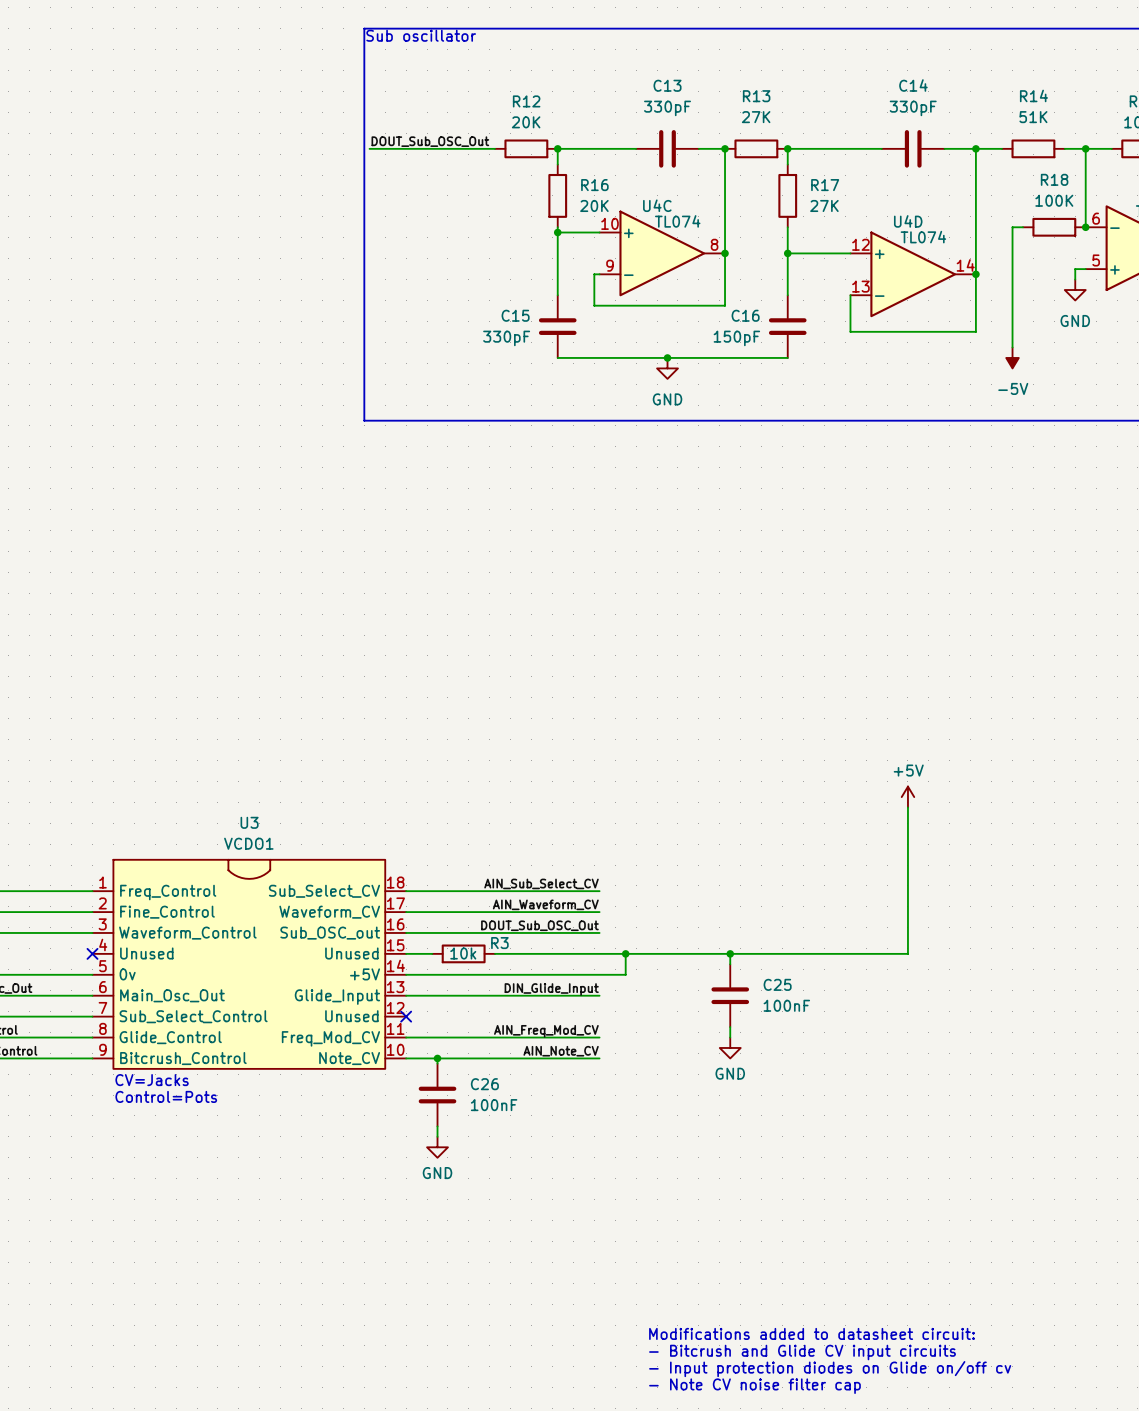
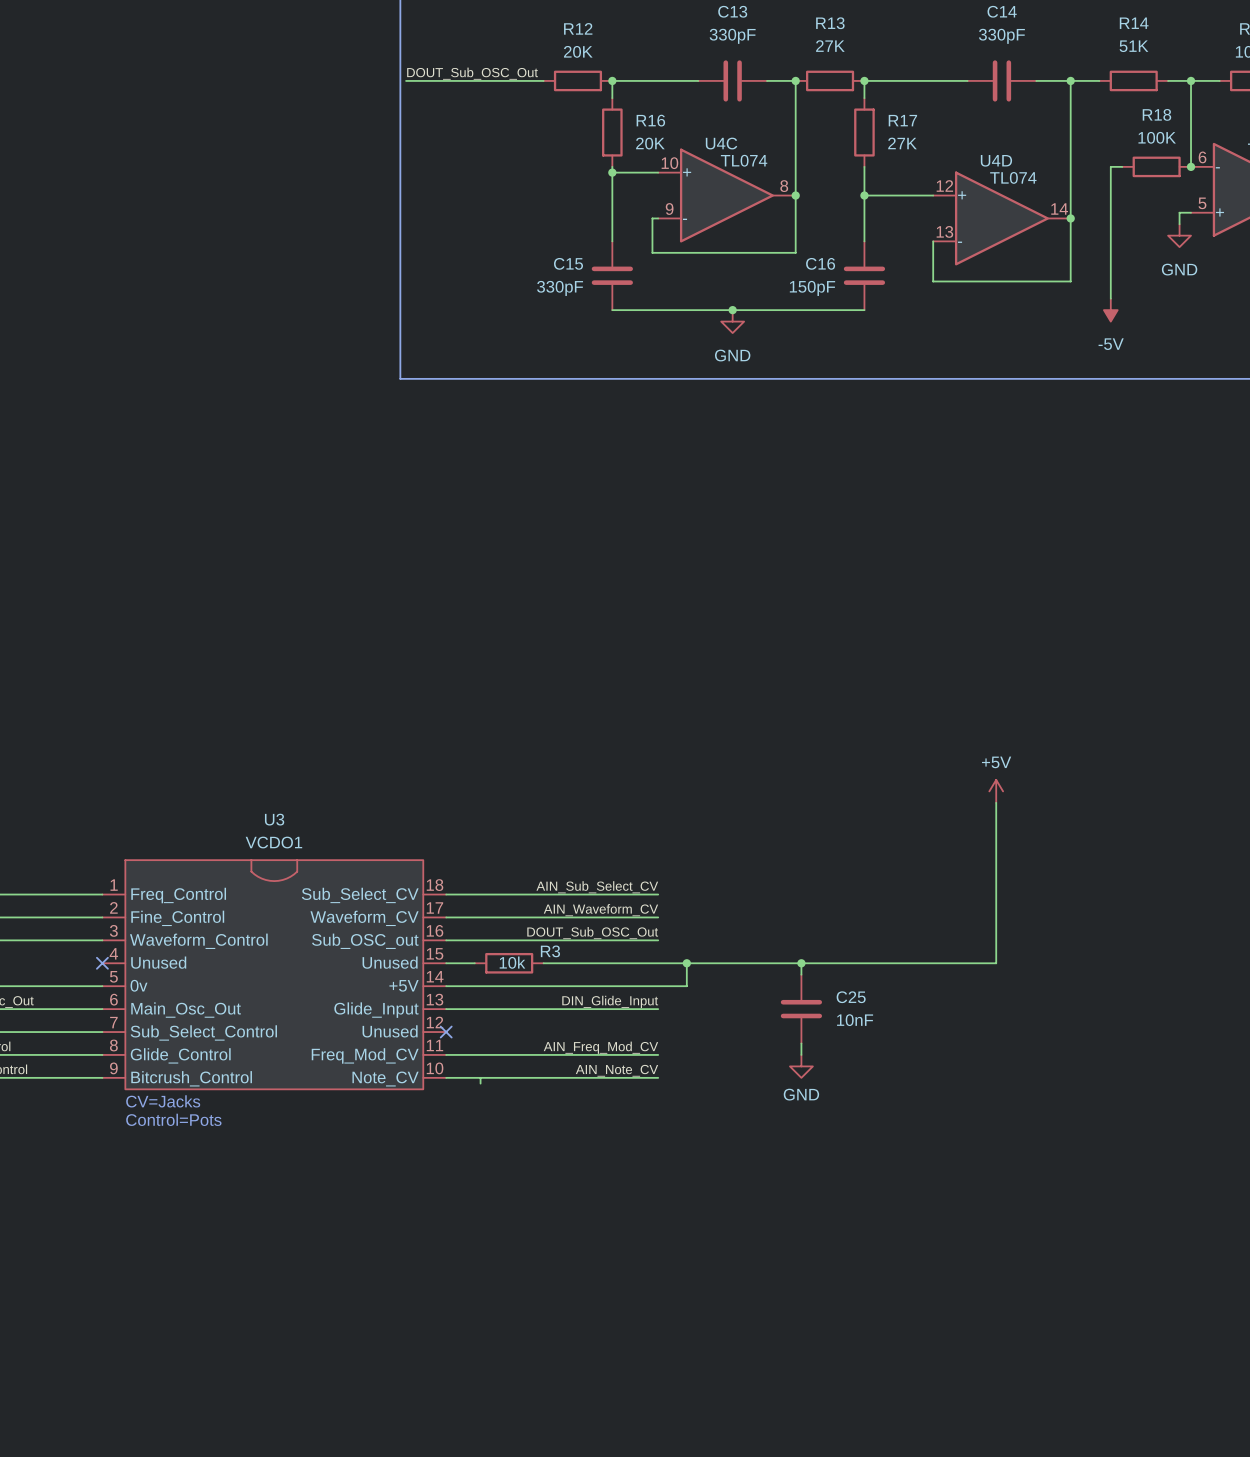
C25 value: 100nF (786, 1005) -> 10nF (855, 1020)
junction: (437, 1058) -> none
C26: 100nF (437, 1095) -> none
wire: (437, 1126) (437, 1136) -> none
power symbol: GND (437, 1147) -> none
text: Modifications added to datasheet circuit: (811, 1333) -> none
text: - Bitcrush and Glide CV input circuits (802, 1352) -> none
text: - Input protection diodes on Glide on/off cv (830, 1369) -> none
text: - Note CV noise filter cap (754, 1386) -> none

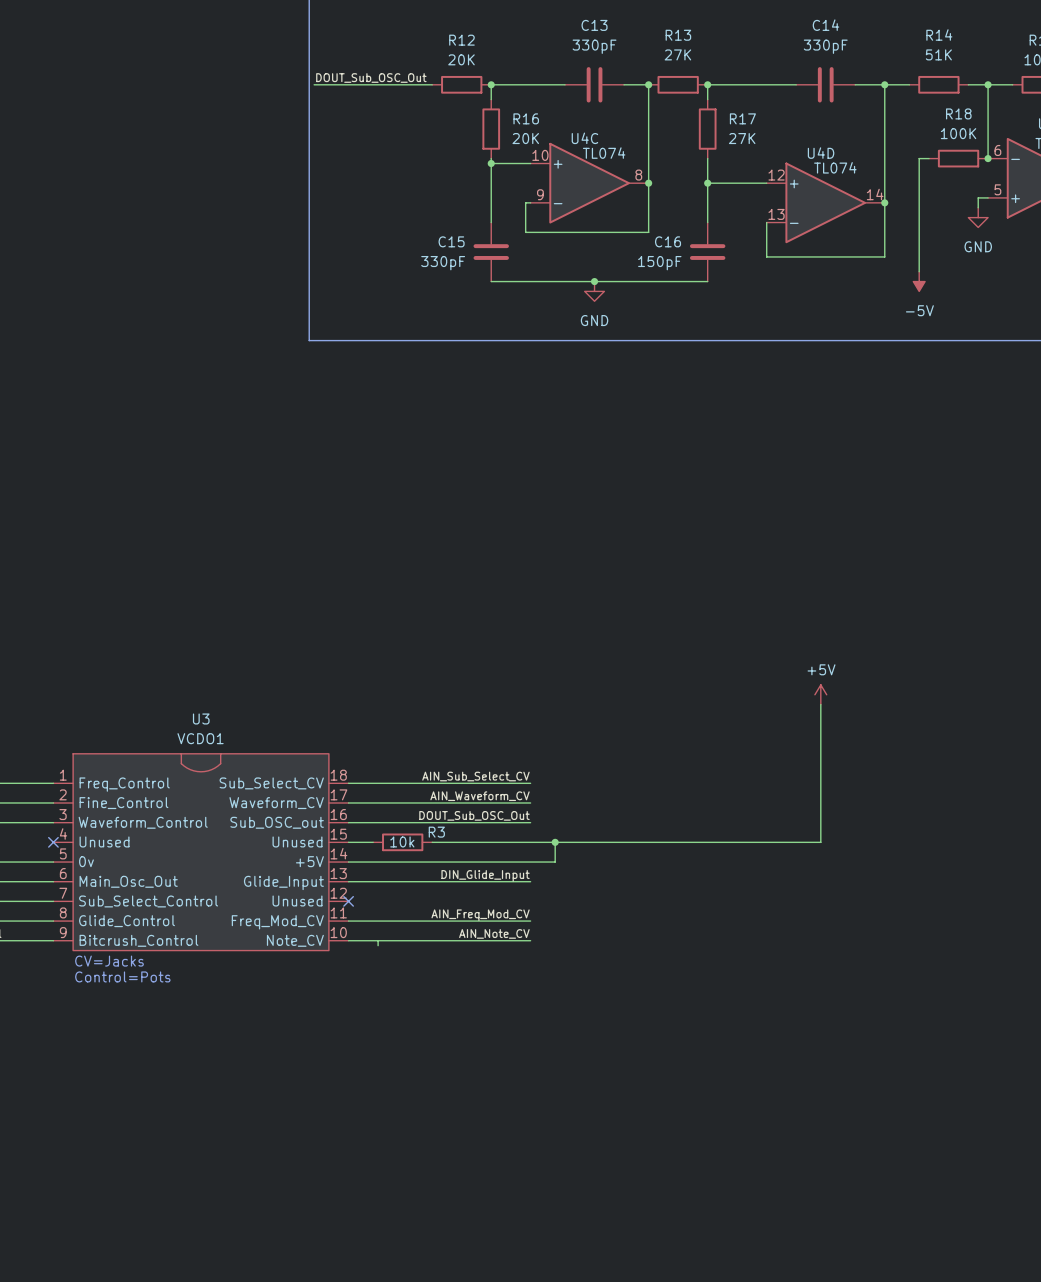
wire: (801, 963) (801, 974) -> none
junction: (801, 963) -> none
C25: 10nF (801, 1009) -> none
wire: (801, 1043) (801, 1054) -> none
power symbol: GND (801, 1066) -> none

